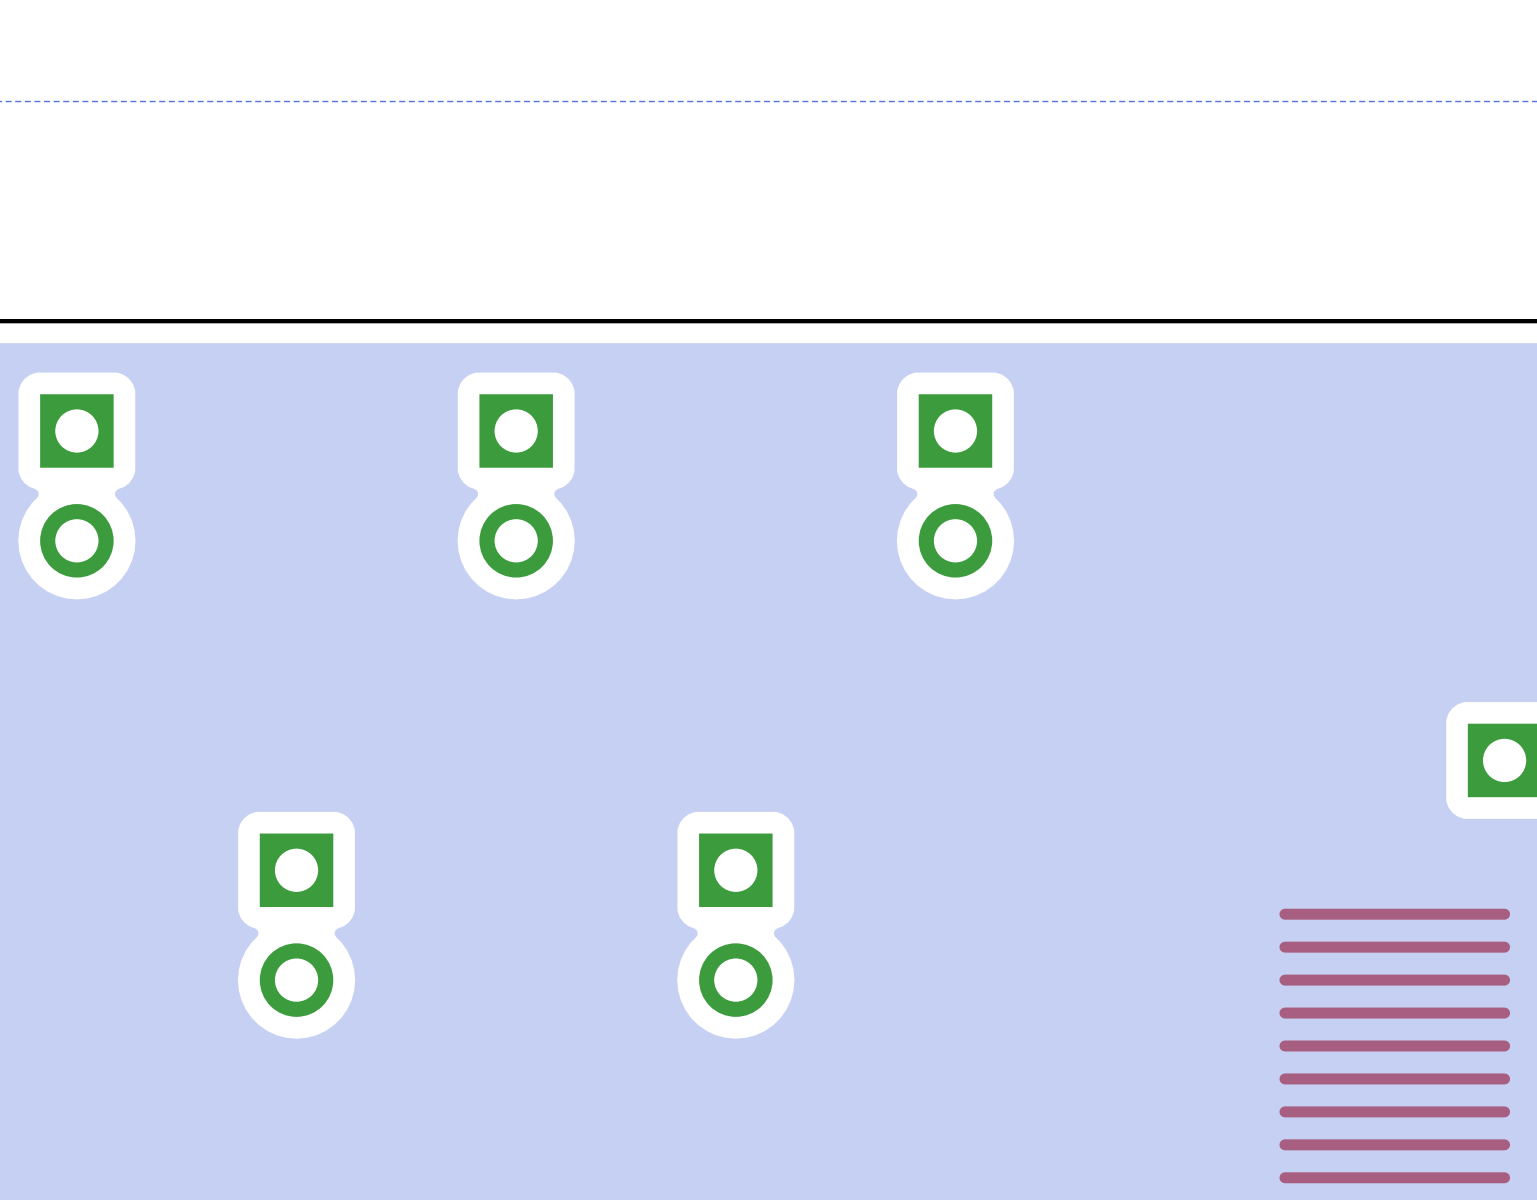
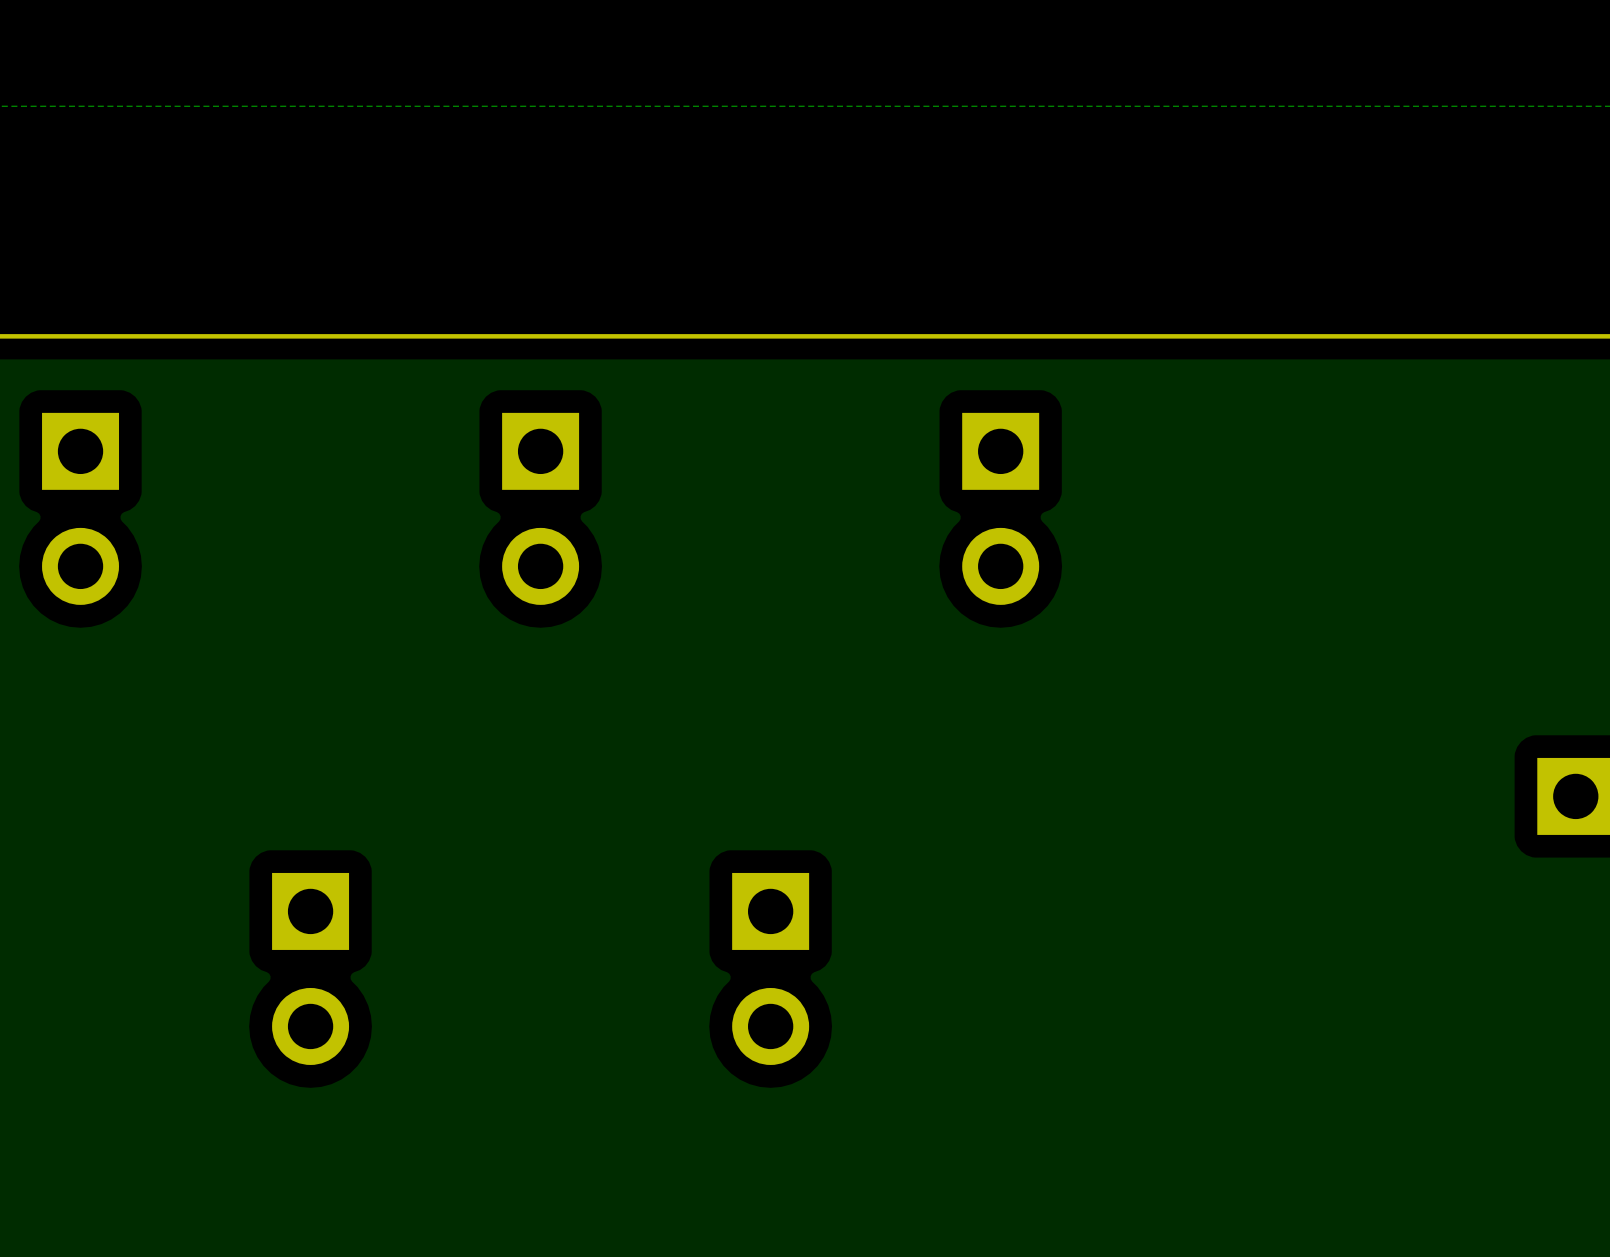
top track: (1504, 914) (1284, 914) -> none
top track: (1504, 947) (1284, 947) -> none
top track: (1504, 980) (1284, 980) -> none
top track: (1504, 1013) (1284, 1013) -> none
top track: (1504, 1045) (1284, 1045) -> none
top track: (1504, 1078) (1284, 1078) -> none
top track: (1504, 1111) (1284, 1111) -> none
top track: (1504, 1144) (1284, 1144) -> none
top track: (1504, 1177) (1284, 1177) -> none

